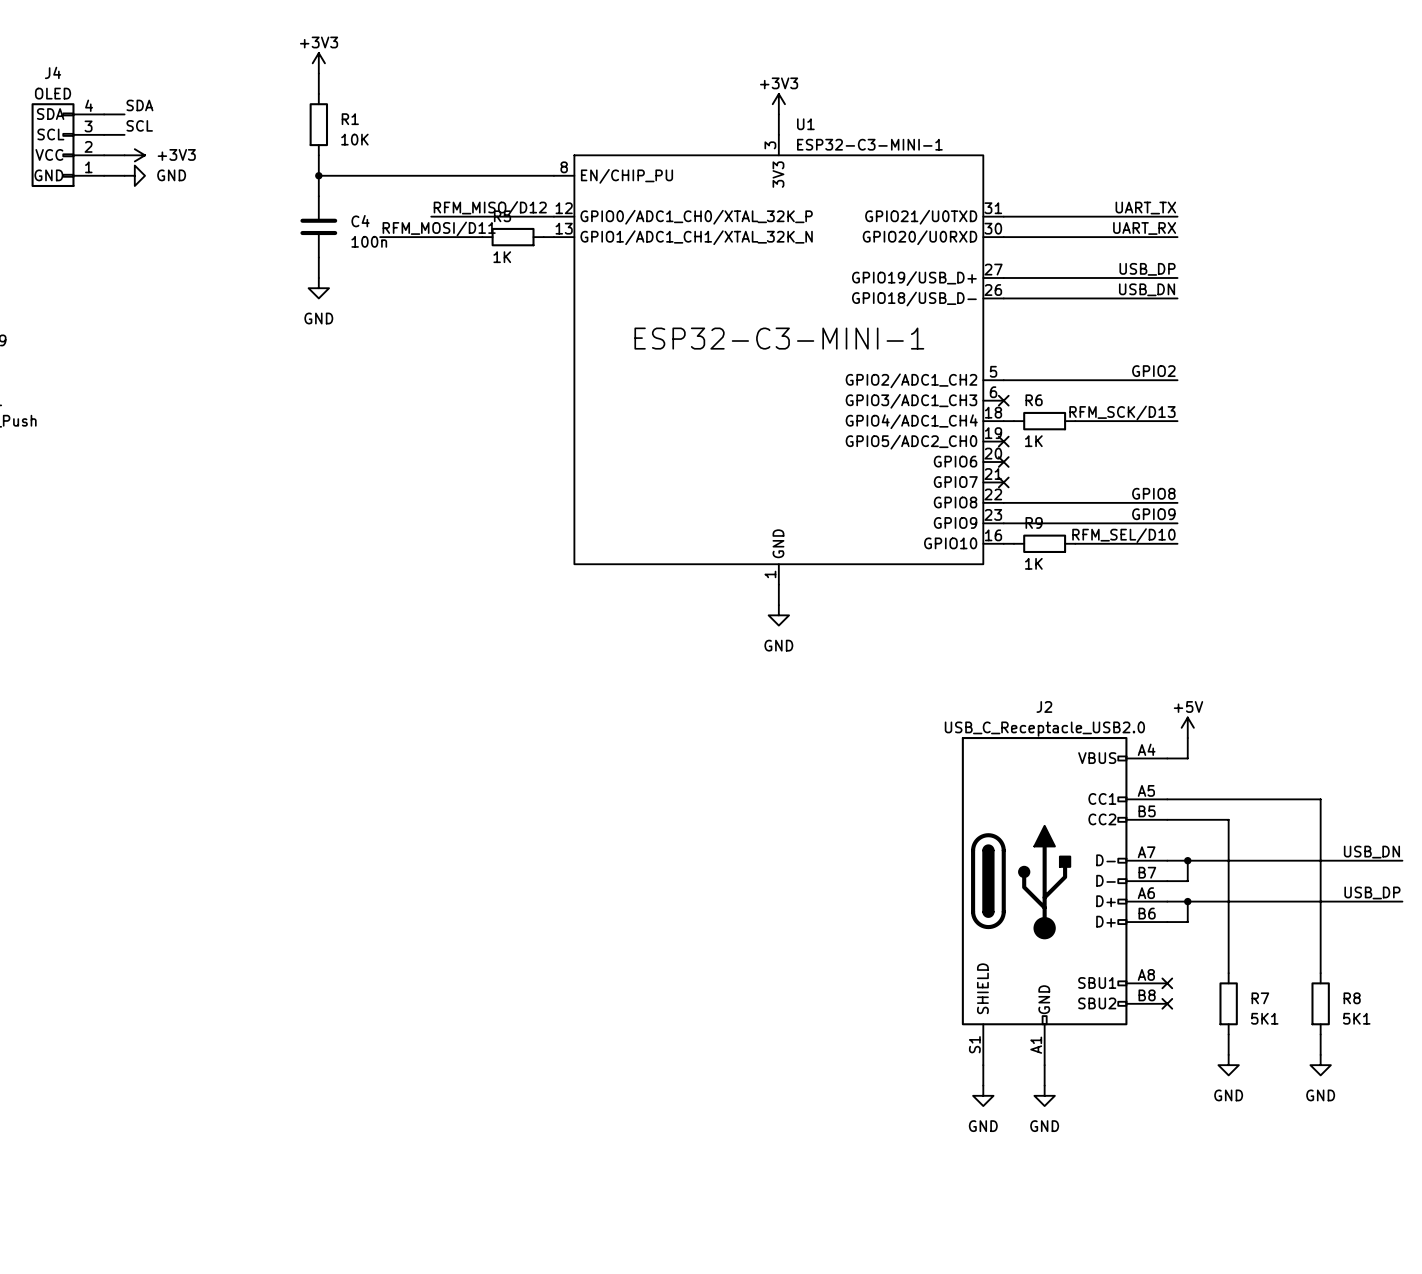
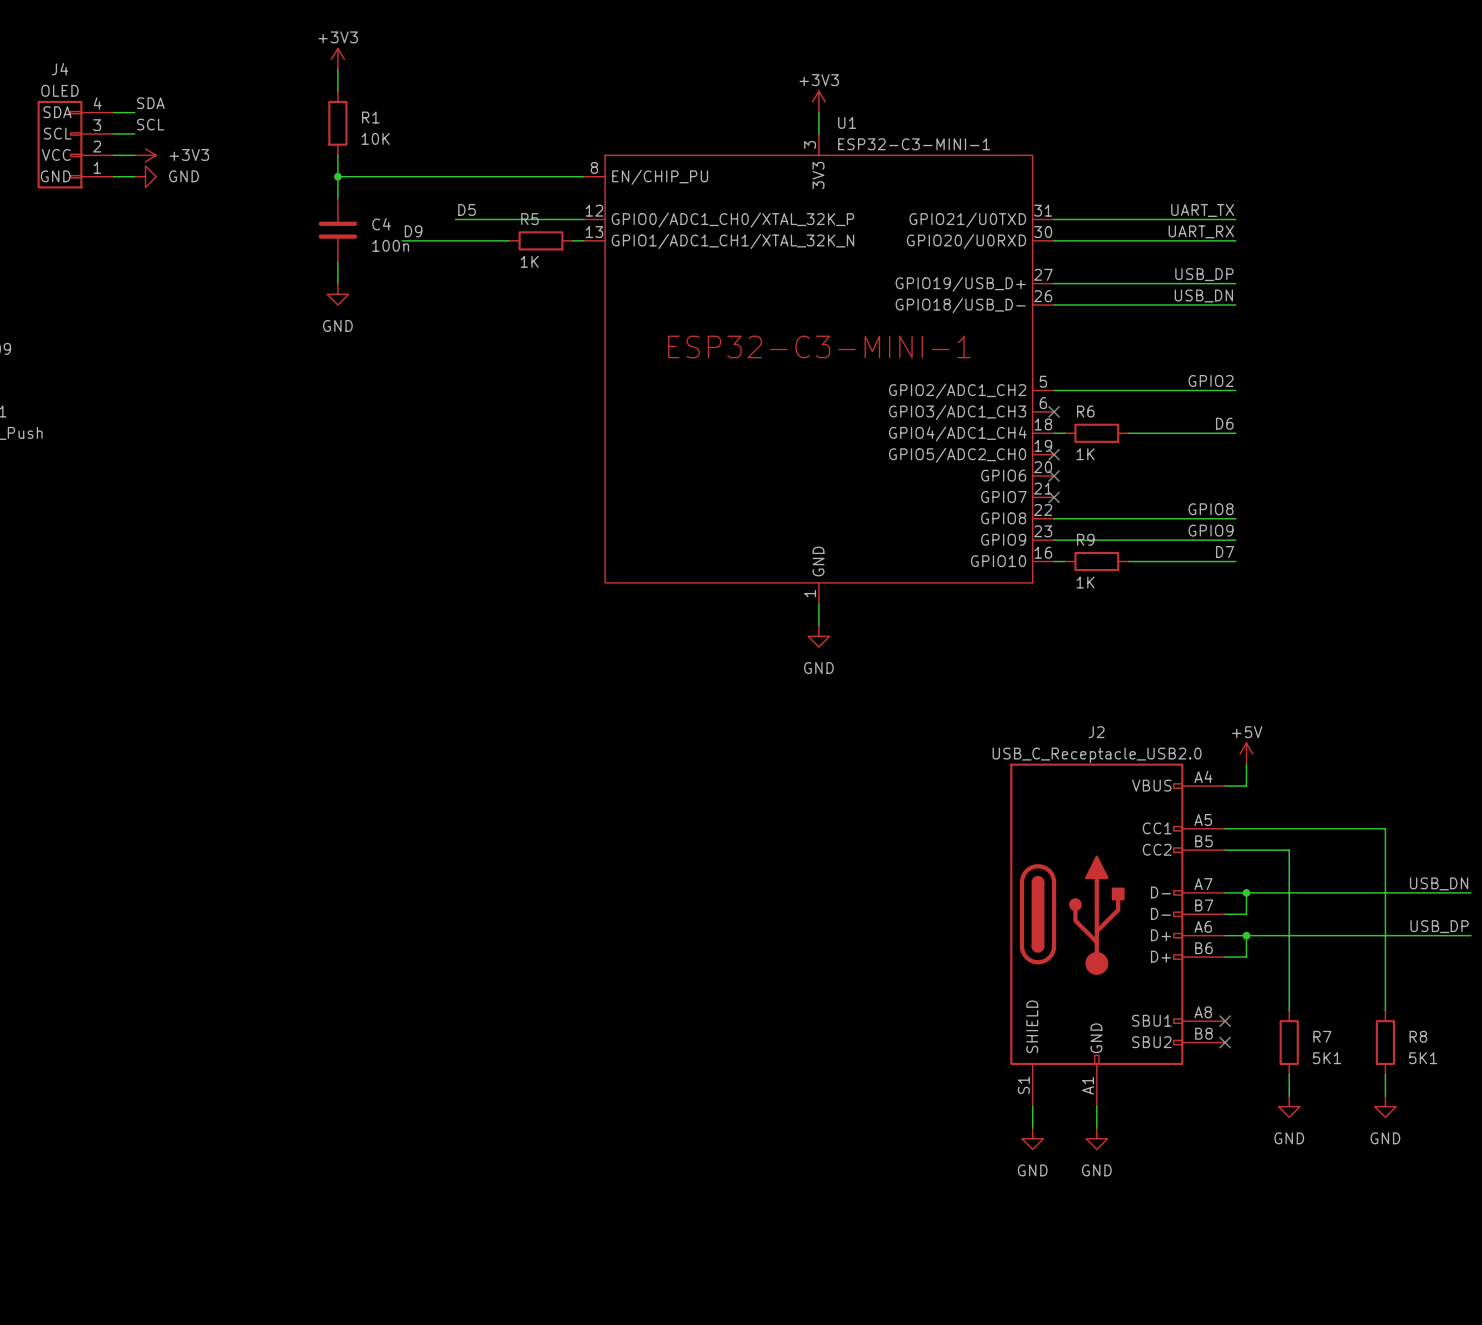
label: RFM_MISO/D12 (490, 208) -> D5 (467, 209)
label: RFM_MOSI/D11 (439, 228) -> D9 (413, 231)
label: RFM_SCK/D13 (1122, 412) -> D6 (1224, 423)
label: RFM_SEL/D10 (1123, 535) -> D7 (1225, 552)

